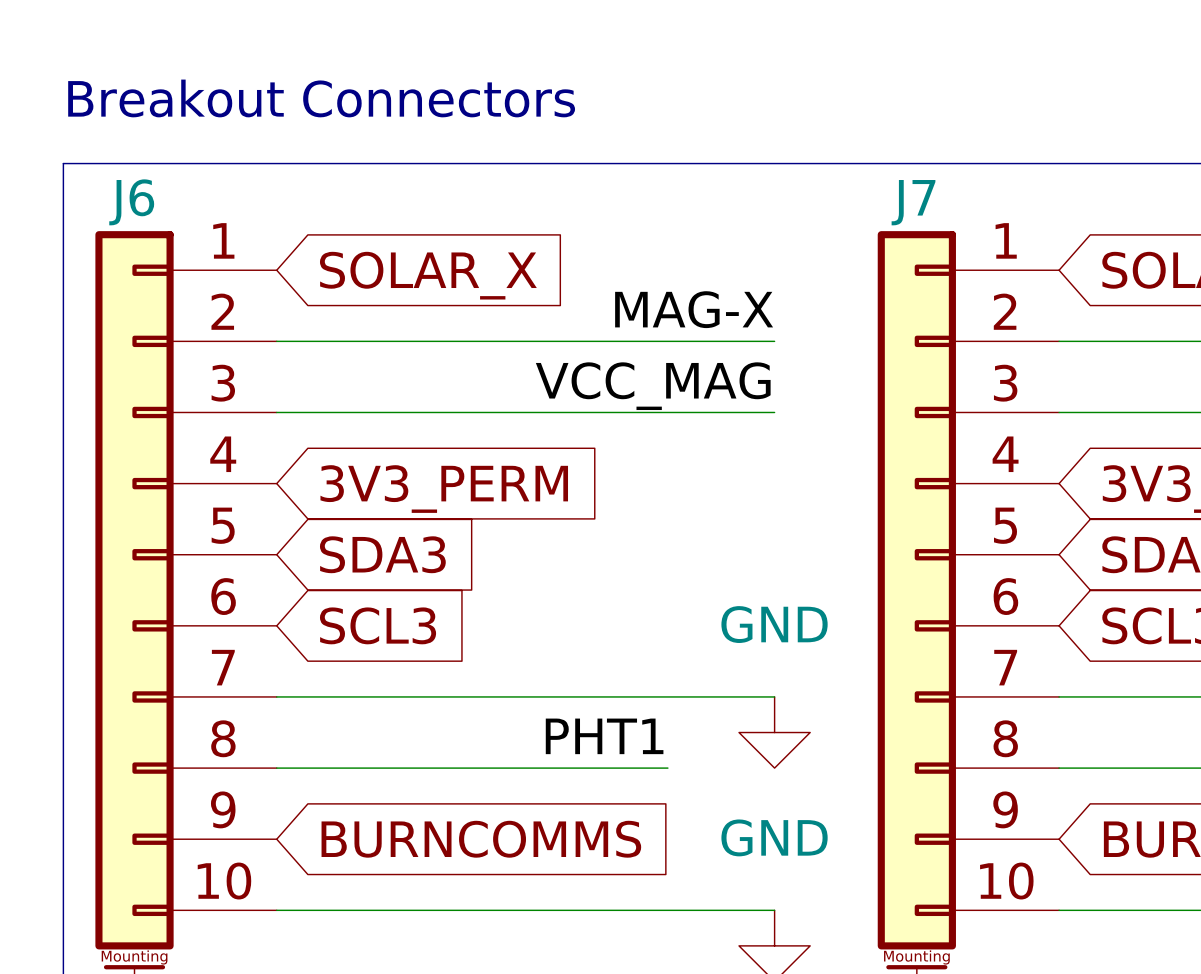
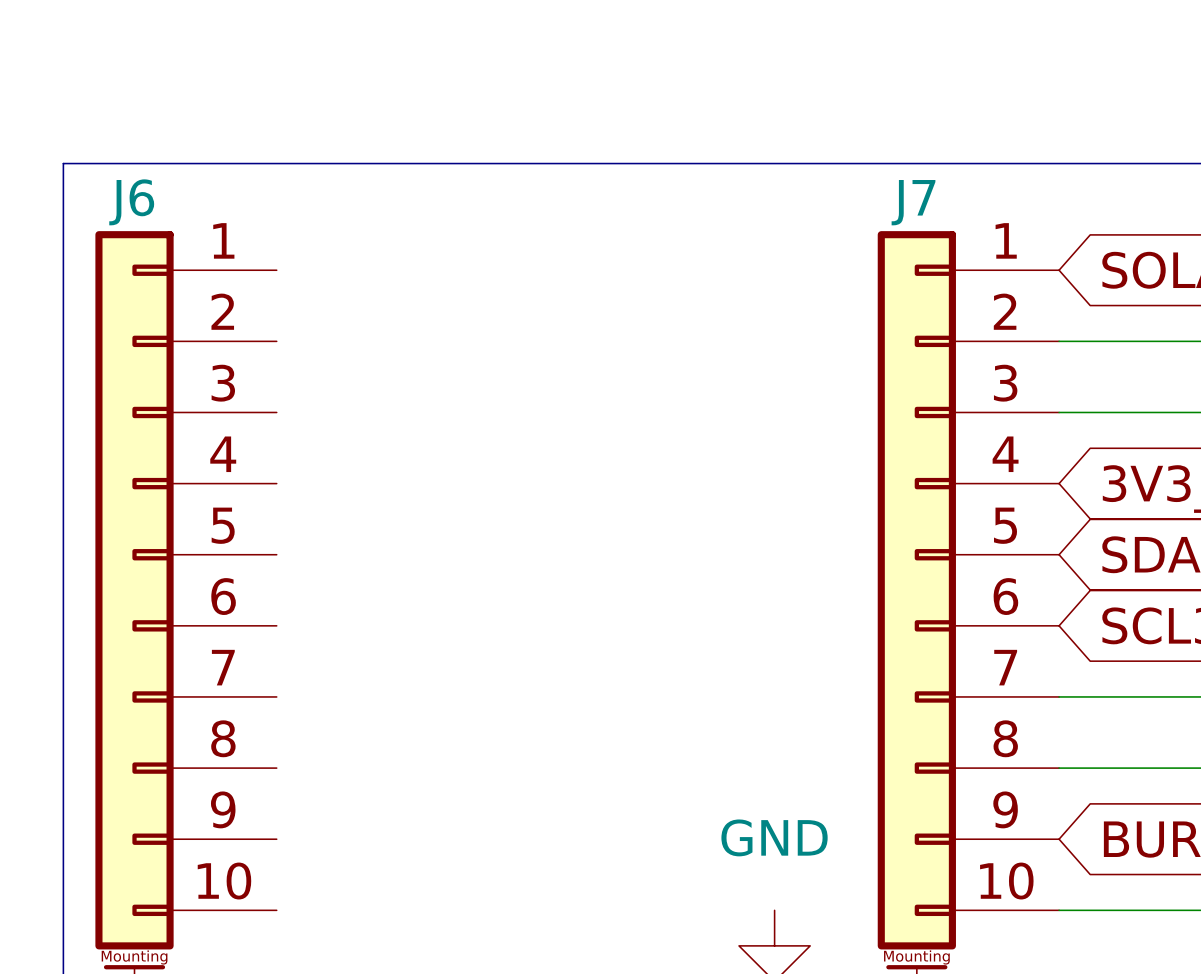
text: Breakout Connectors (321, 98) -> none
global label: SOLAR_X (428, 275) -> none
label: MAG-X (694, 309) -> none
wire: (276, 341) (774, 341) -> none
label: VCC_MAG (653, 386) -> none
wire: (276, 412) (774, 412) -> none
global label: 3V3_PERM (444, 489) -> none
global label: SDA3 (382, 554) -> none
global label: SCL3 (378, 625) -> none
wire: (276, 696) (774, 696) -> none
power symbol: GND (774, 732) -> none
label: PHT1 (604, 736) -> none
wire: (276, 768) (667, 768) -> none
global label: BURNCOMMS (481, 839) -> none
wire: (276, 910) (774, 910) -> none

